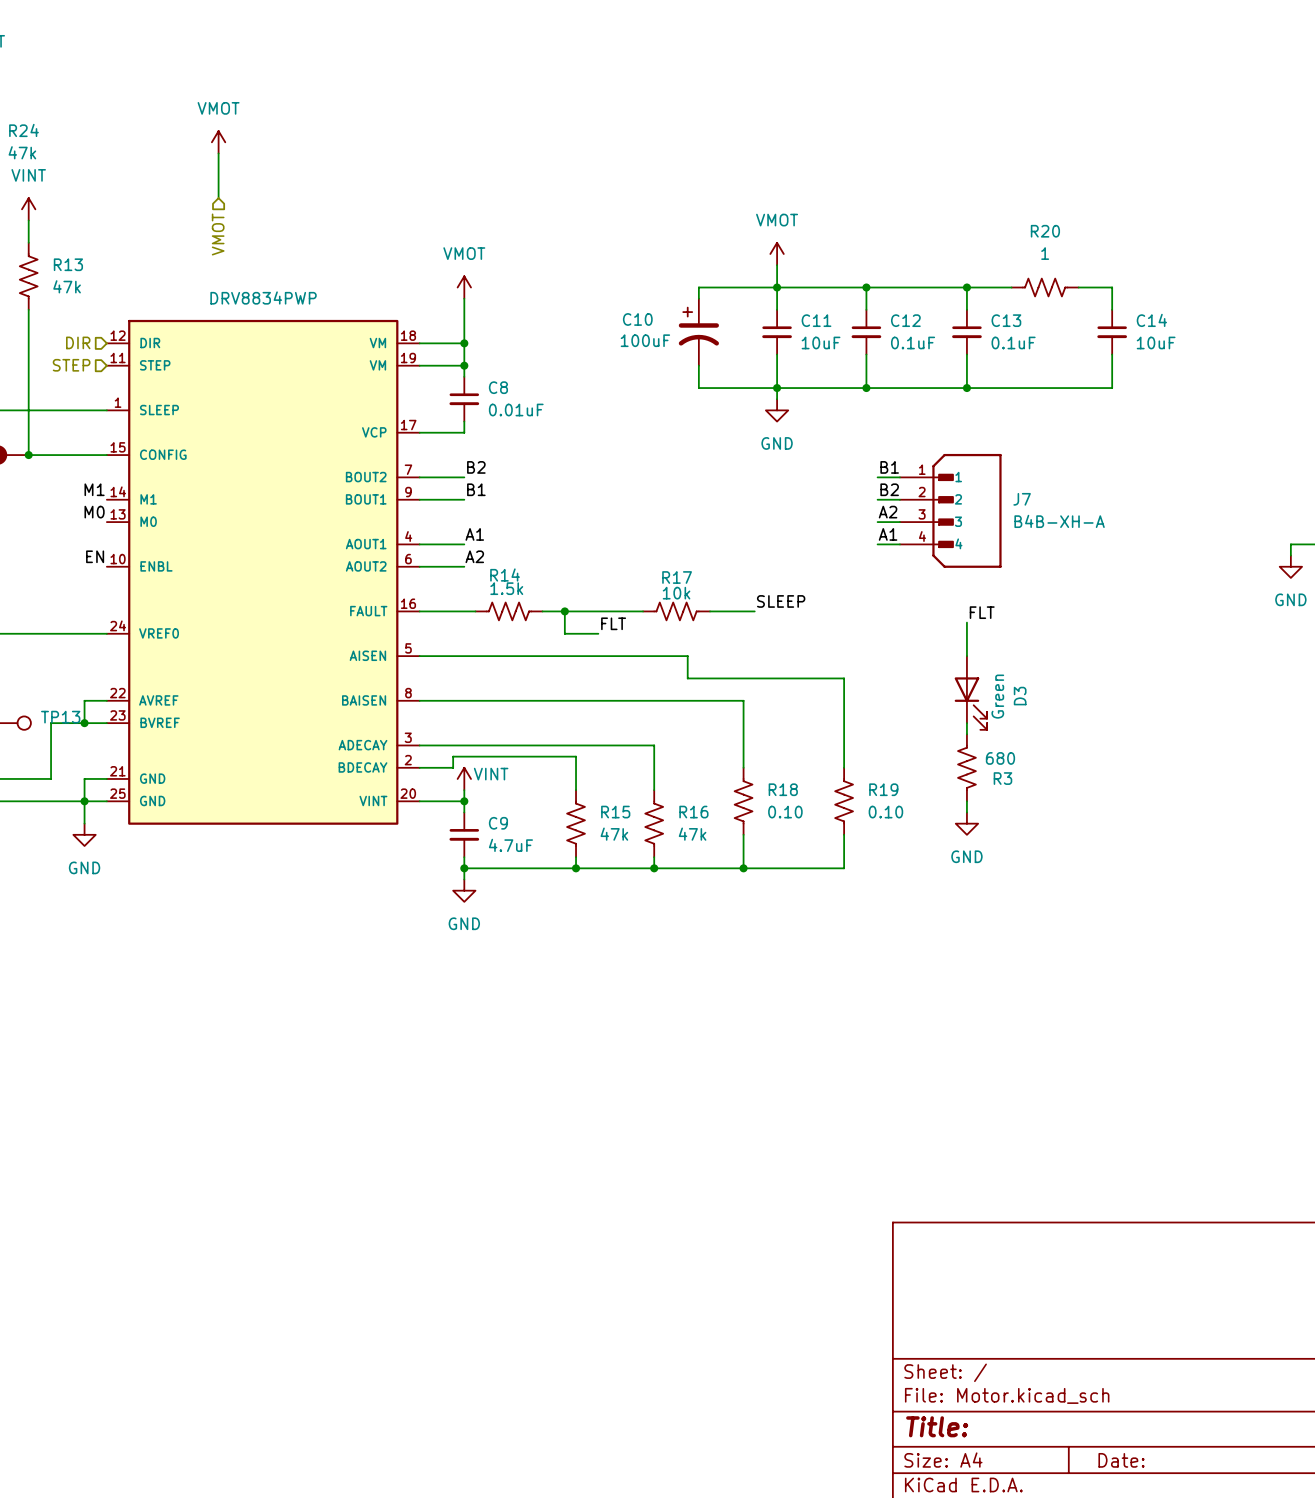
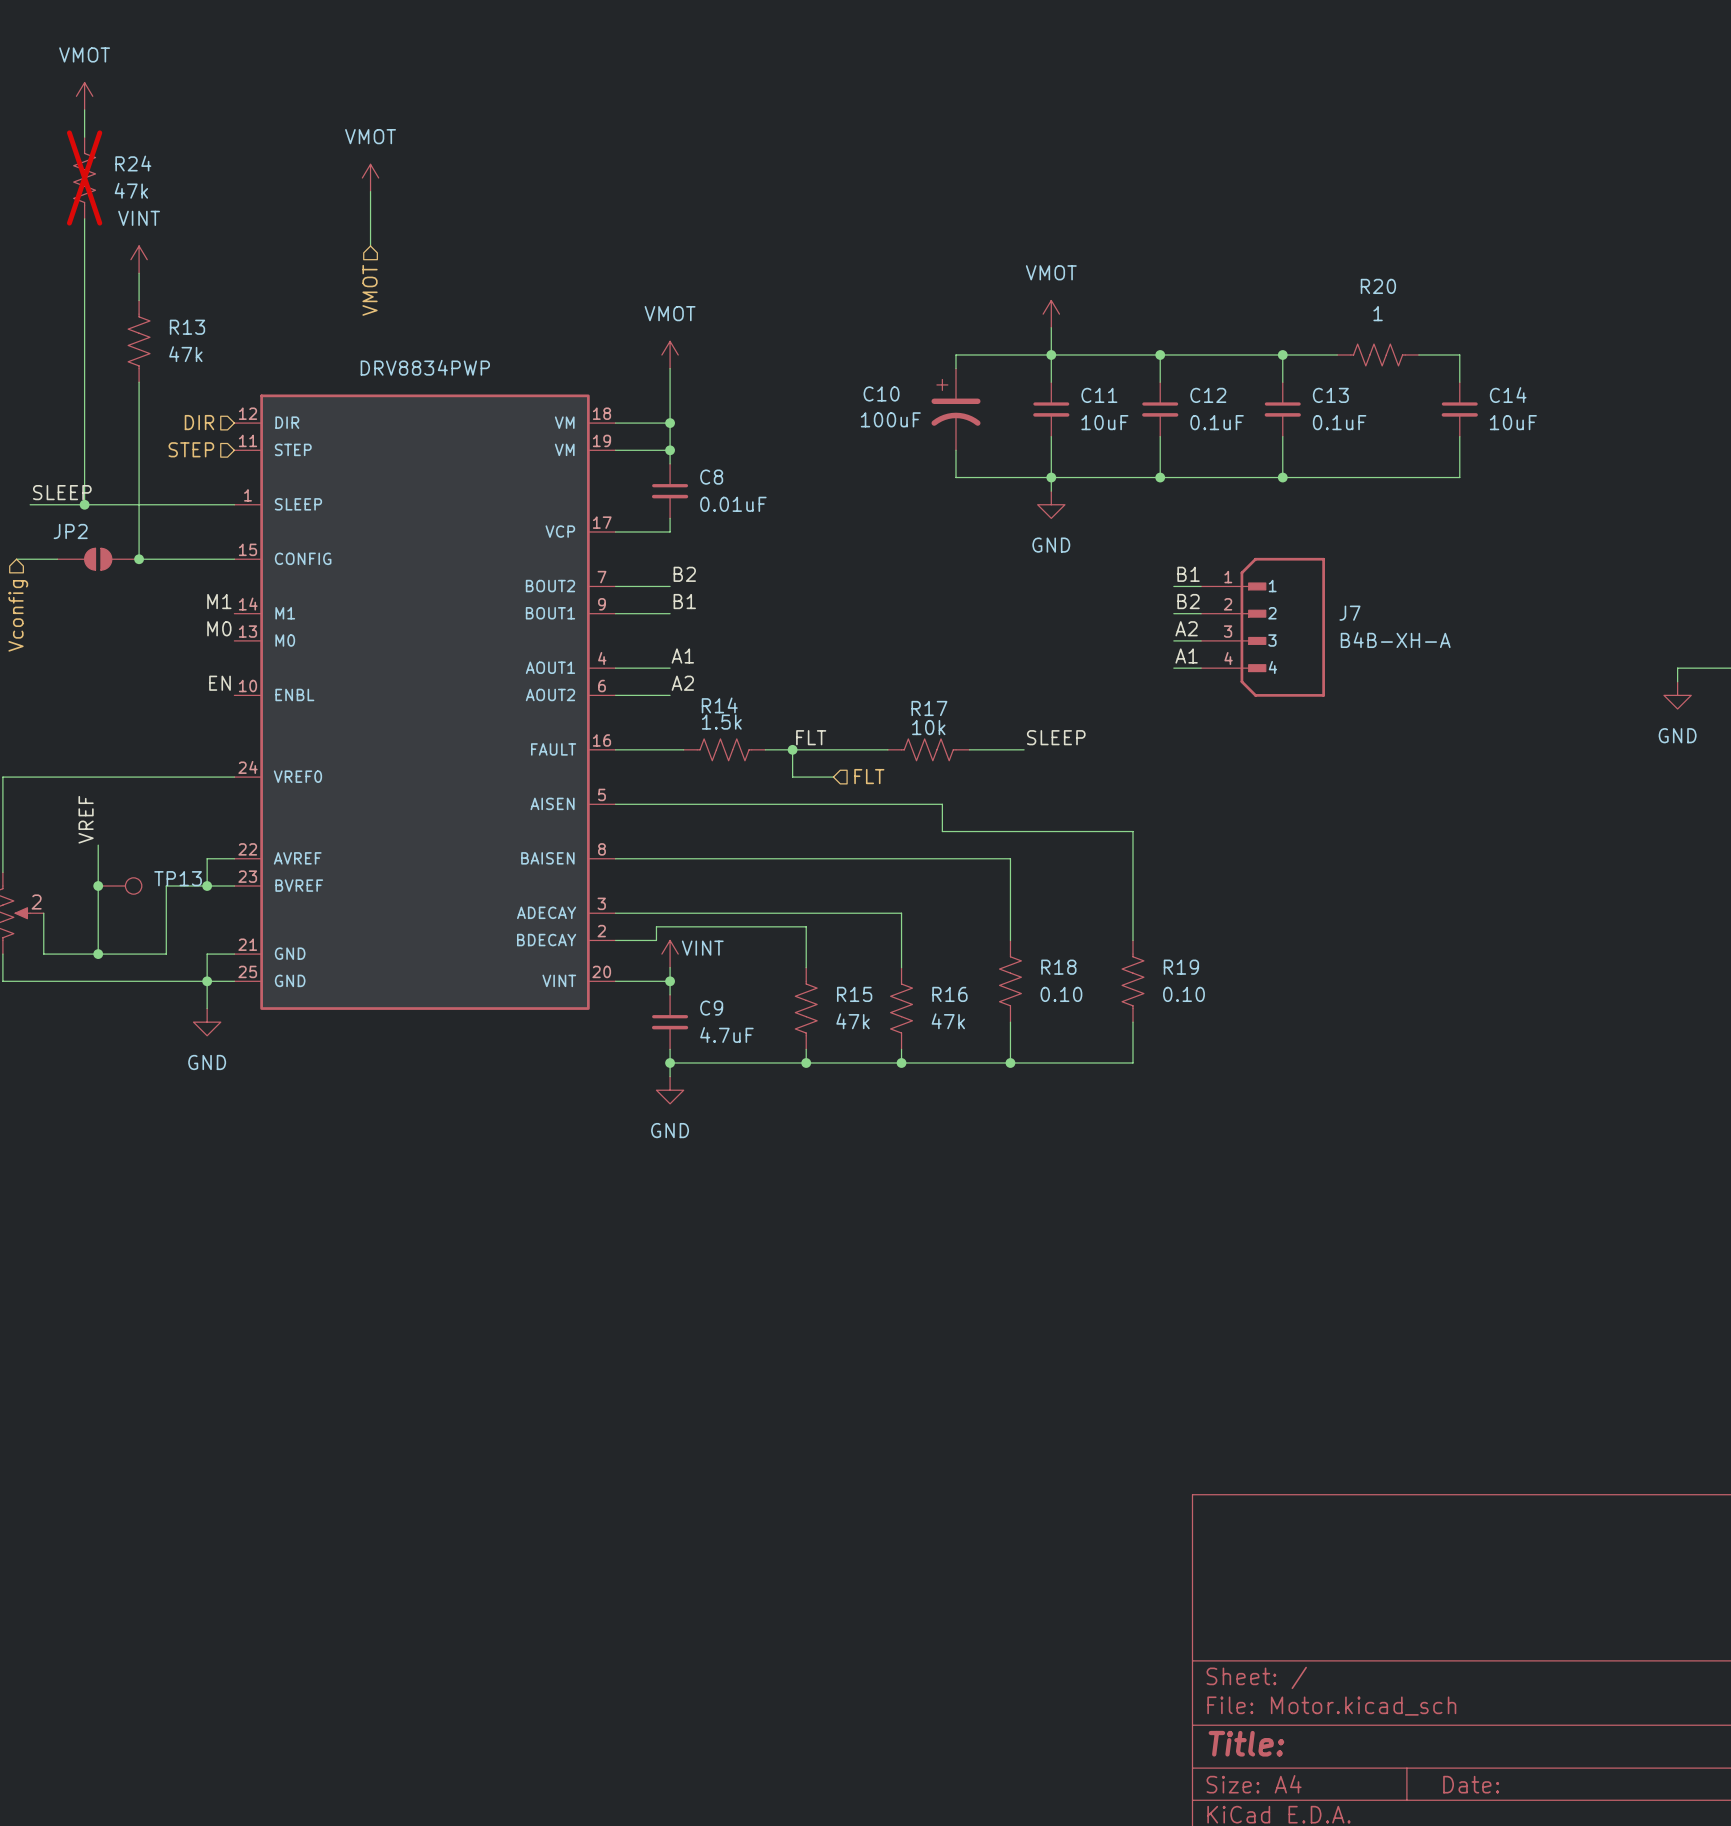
label: FLT (982, 612) -> none
wire: (966, 622) (966, 656) -> none
label position: FLT (613, 623) -> FLT (811, 737)
hierarchical label: none -> FLT (869, 776)
D3: Green (970, 692) -> none
wire: (966, 723) (966, 734) -> none
R3: 680 (966, 767) -> none
wire: (966, 801) (966, 812) -> none
power symbol: GND (966, 823) -> none

